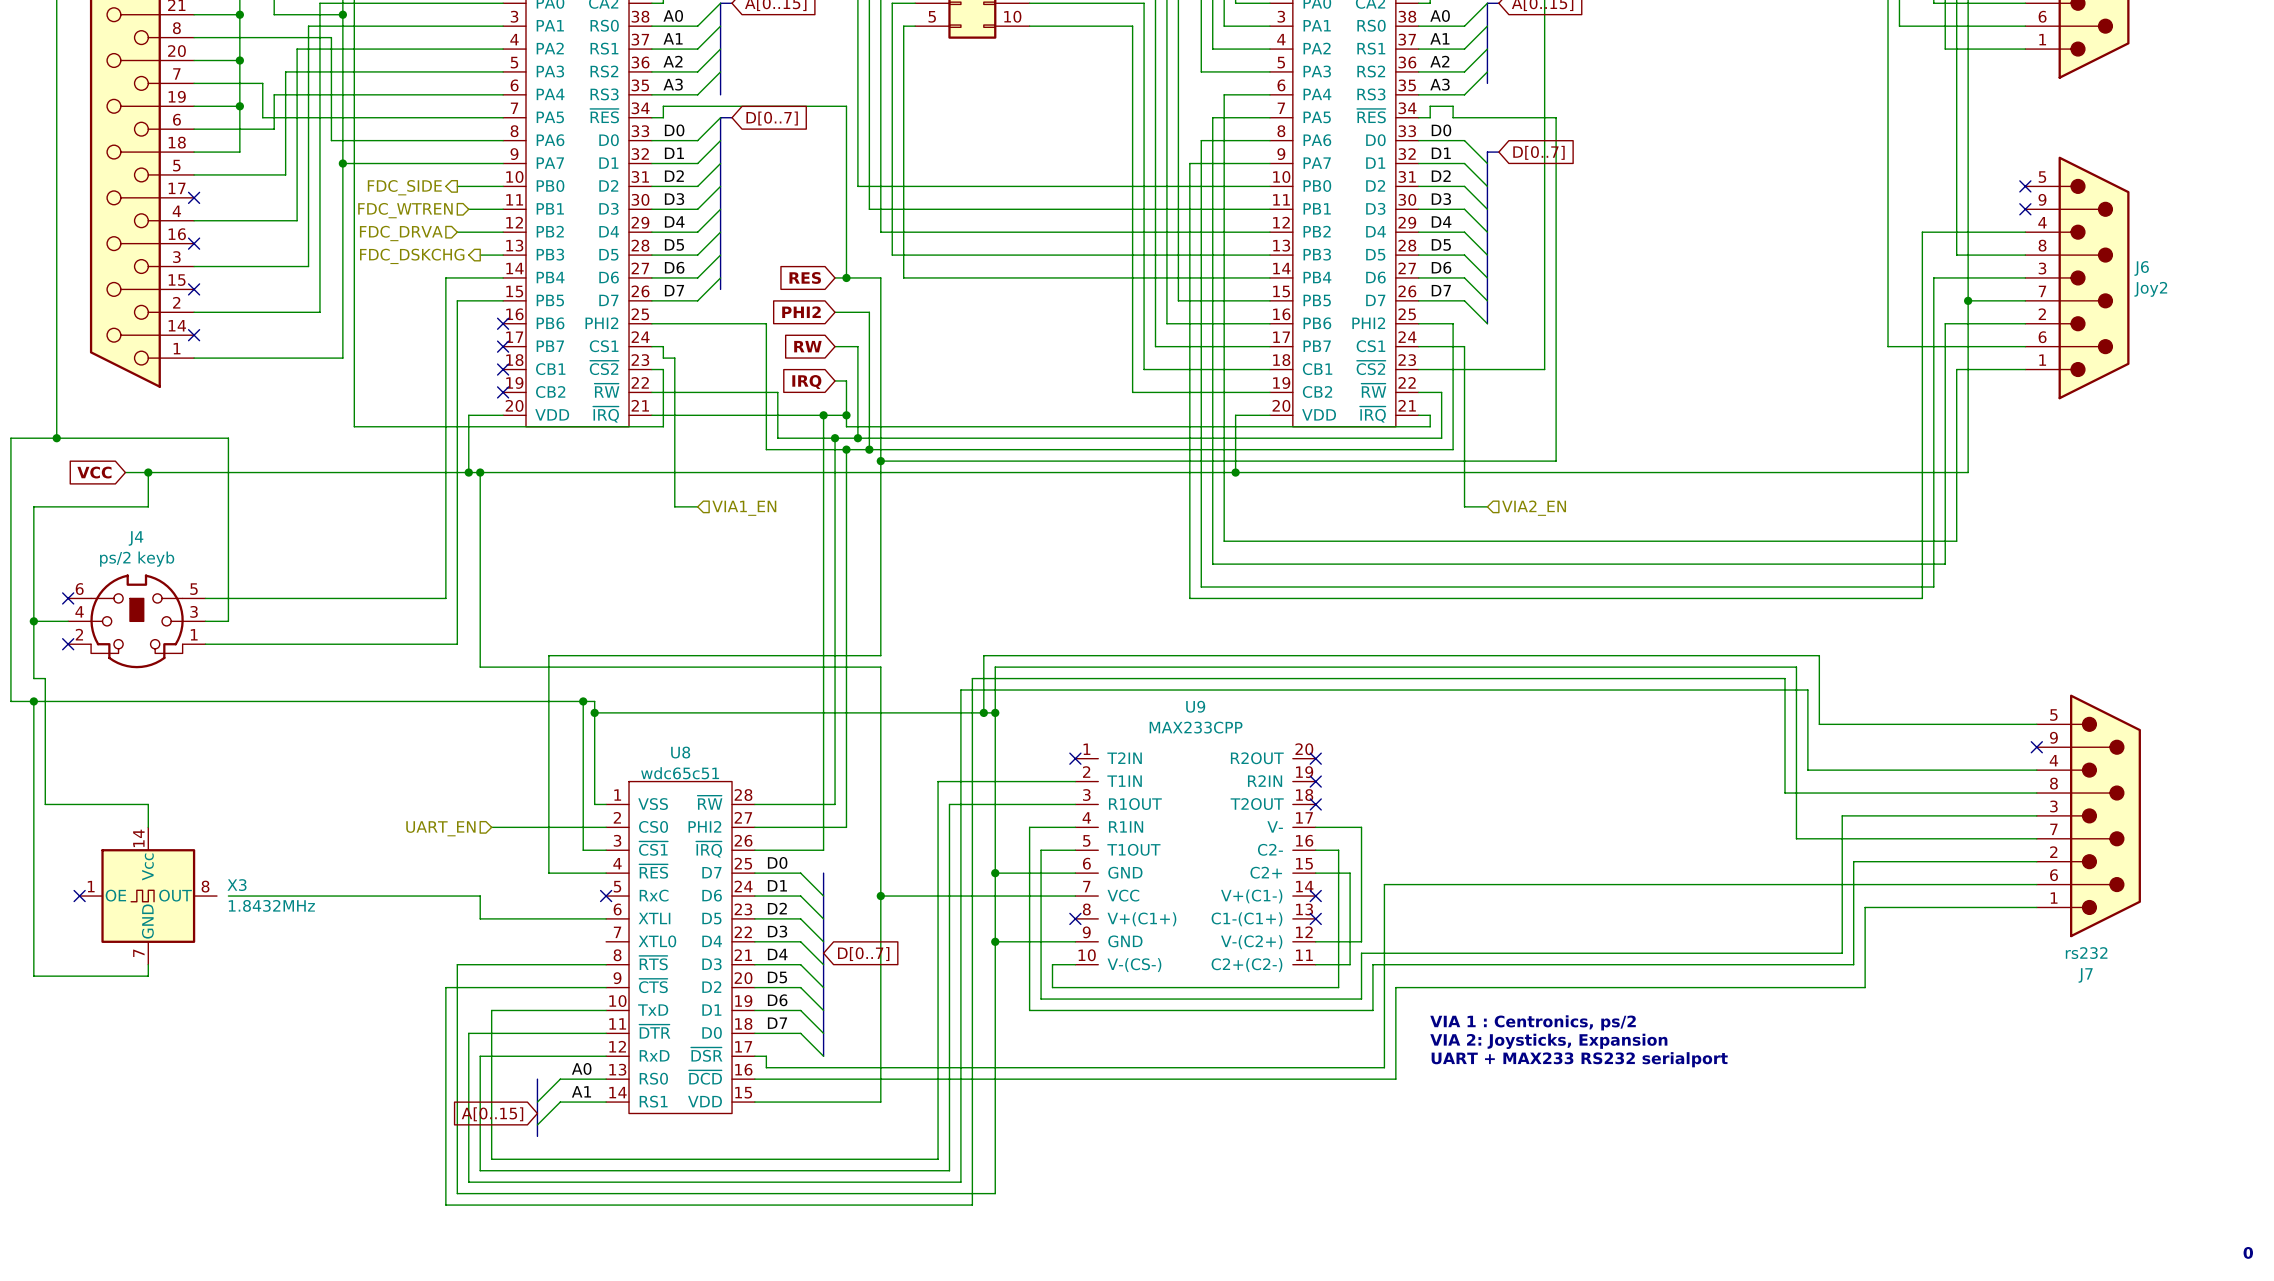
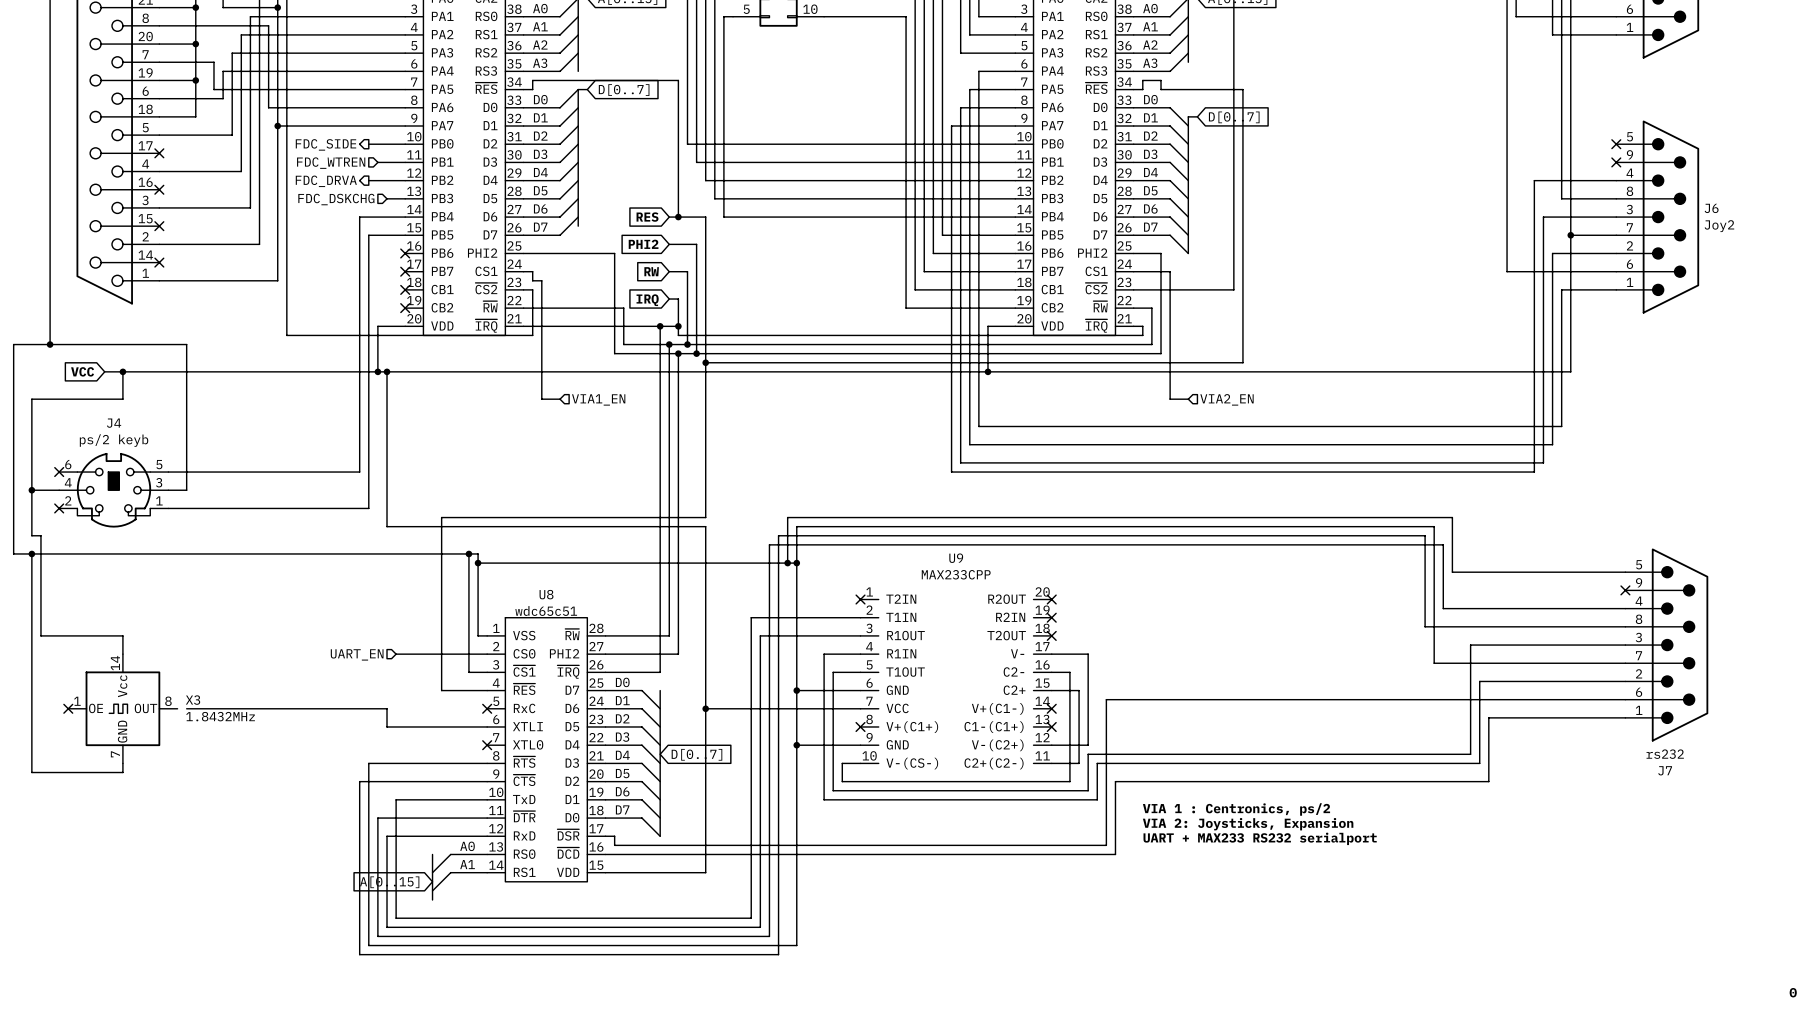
hierarchical label shape: input (401, 233) -> output (326, 181)
hierarchical label shape: output (412, 256) -> input (336, 199)
no-connect mark: none -> (487, 745)

